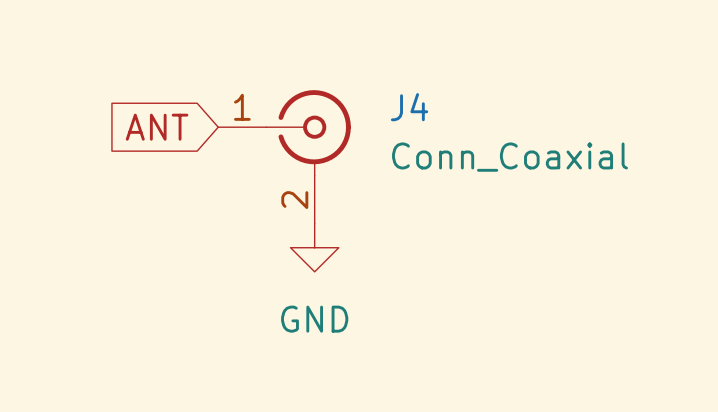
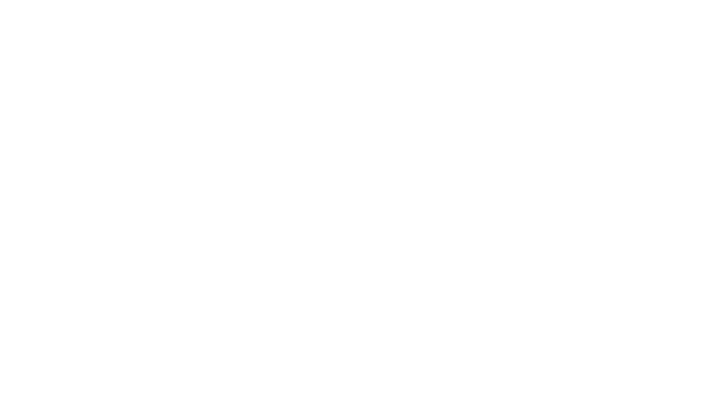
global label: ANT (157, 127) -> none
J4: Conn_Coaxial (284, 156) -> none
power symbol: GND (314, 247) -> none

